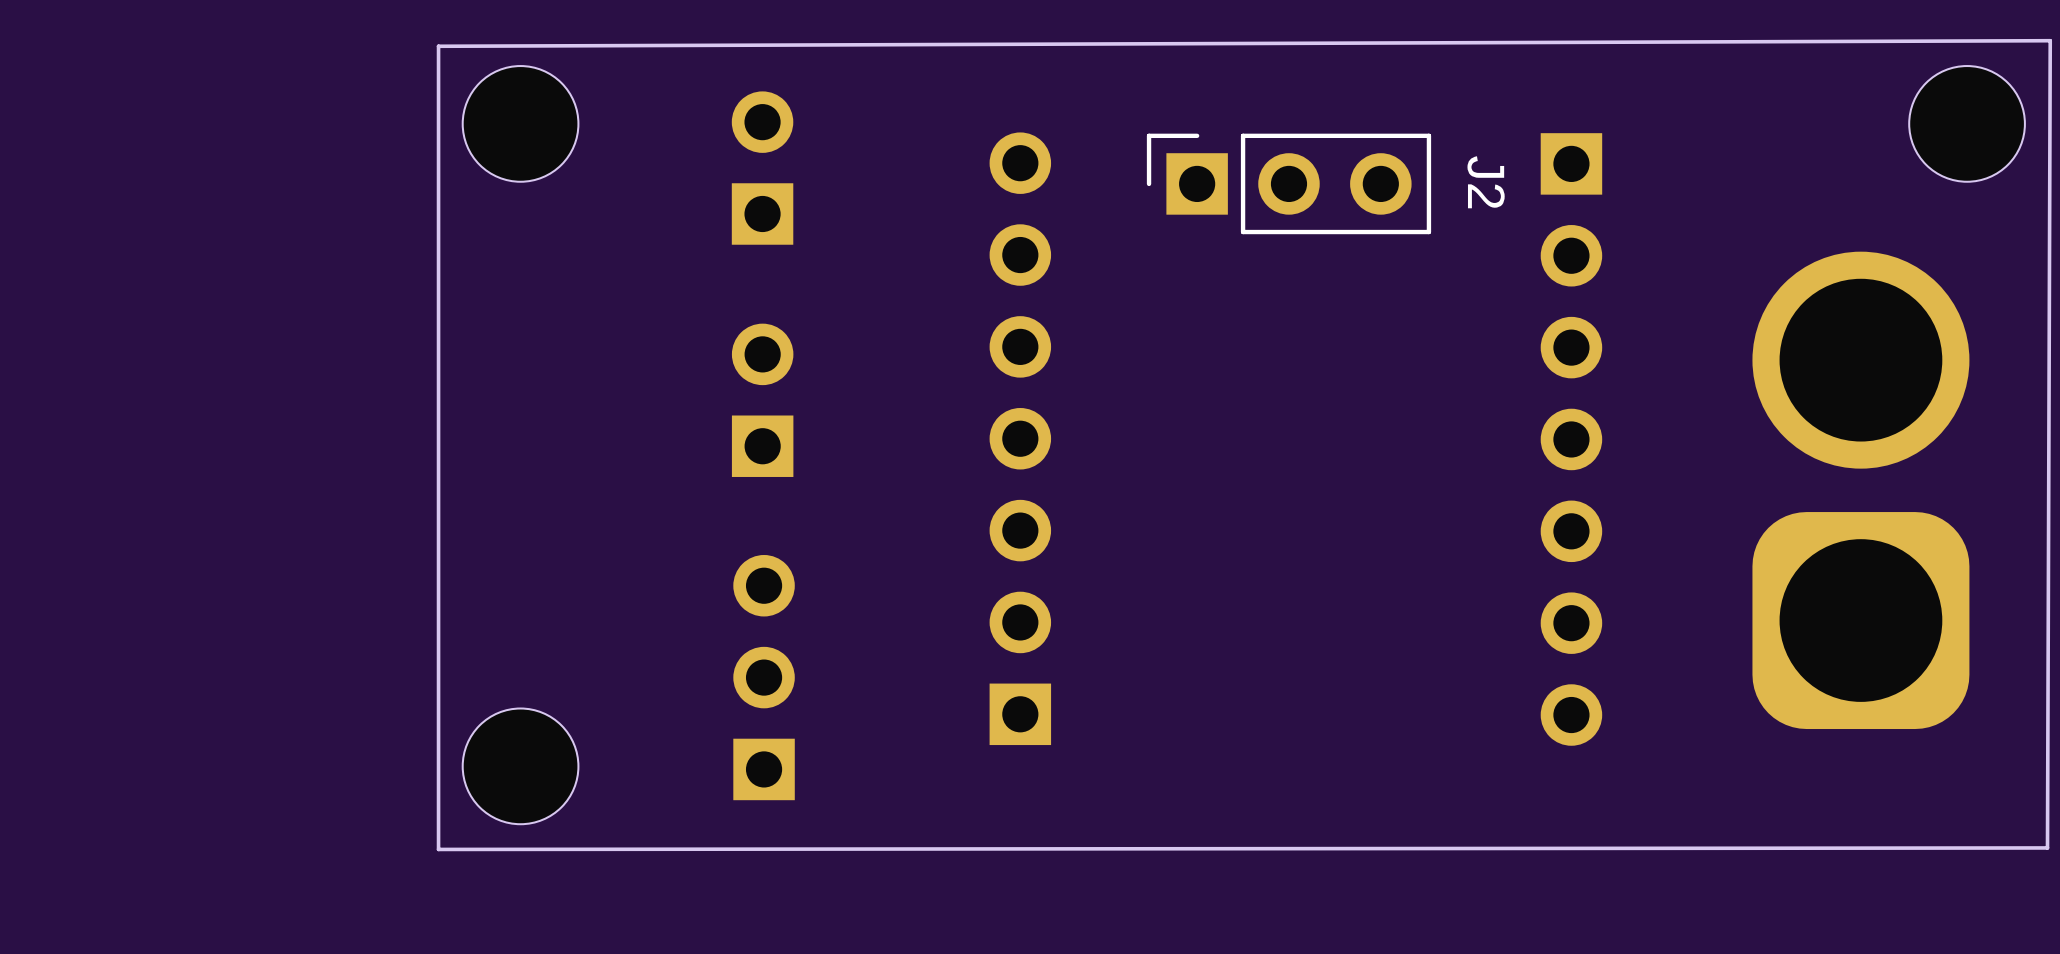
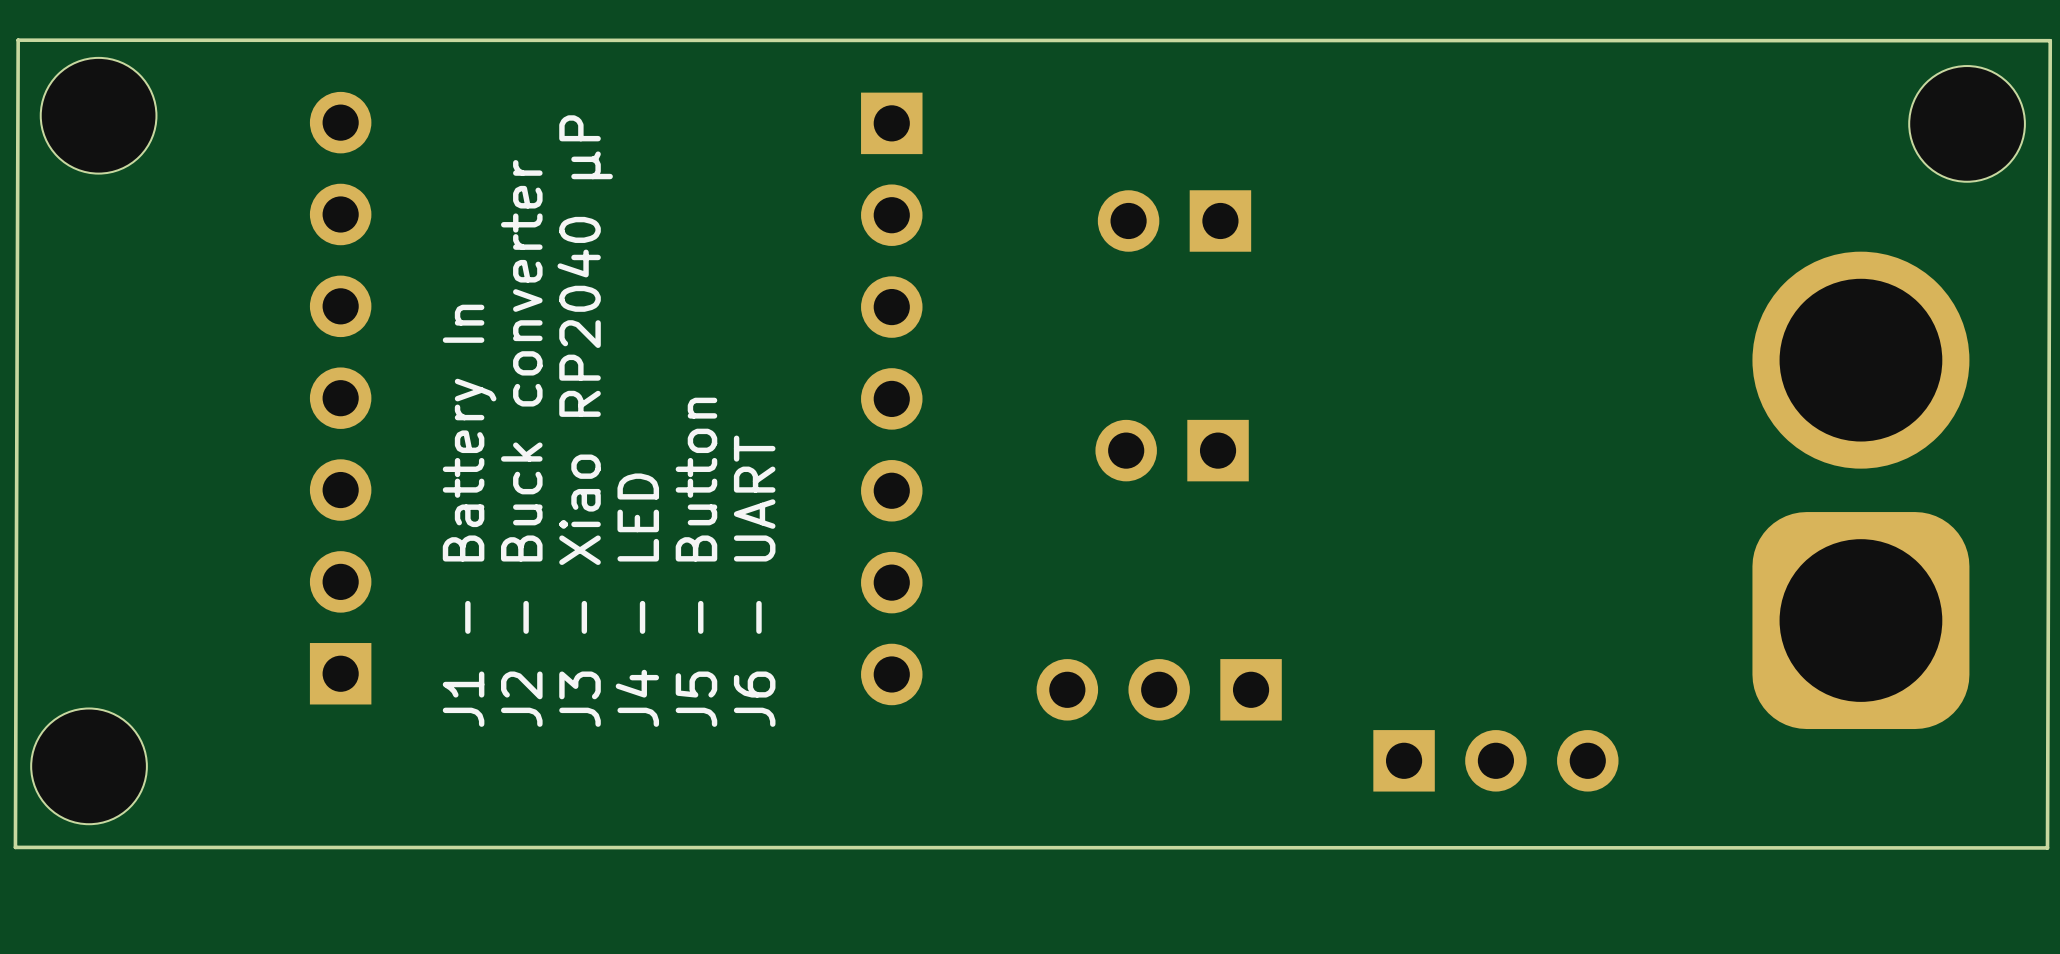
board edge: (2050, 40) (438, 46) (438, 849) (2047, 847) -> (2050, 40) (18, 40) (15, 847) (2047, 847)
part: none -> (98, 115)
part: (520, 123) -> none
part: (762, 168) -> none
J2 side: bottom (1288, 183) -> top (1495, 760)
part: none -> (1174, 220)
part: none -> (340, 398)
part: (762, 400) -> none
part rotation: 0° (1020, 438) -> 180° (891, 398)
part: (1571, 439) -> none
part: none -> (1172, 450)
text: none -> J3 - Xiao RP2040 µP (585, 421)
text: none -> J2 - Buck converter (521, 443)
text: none -> J1 - Battery In (469, 515)
text: none -> J5 - Button (696, 562)
text: none -> J6 - UART (754, 581)
text: none -> J4 - LED (637, 600)
part rotation: 0° (764, 677) -> 90° counterclockwise (1159, 689)
part position: (764, 677) -> (1159, 689)
part: none -> (89, 766)
part: (520, 766) -> none

